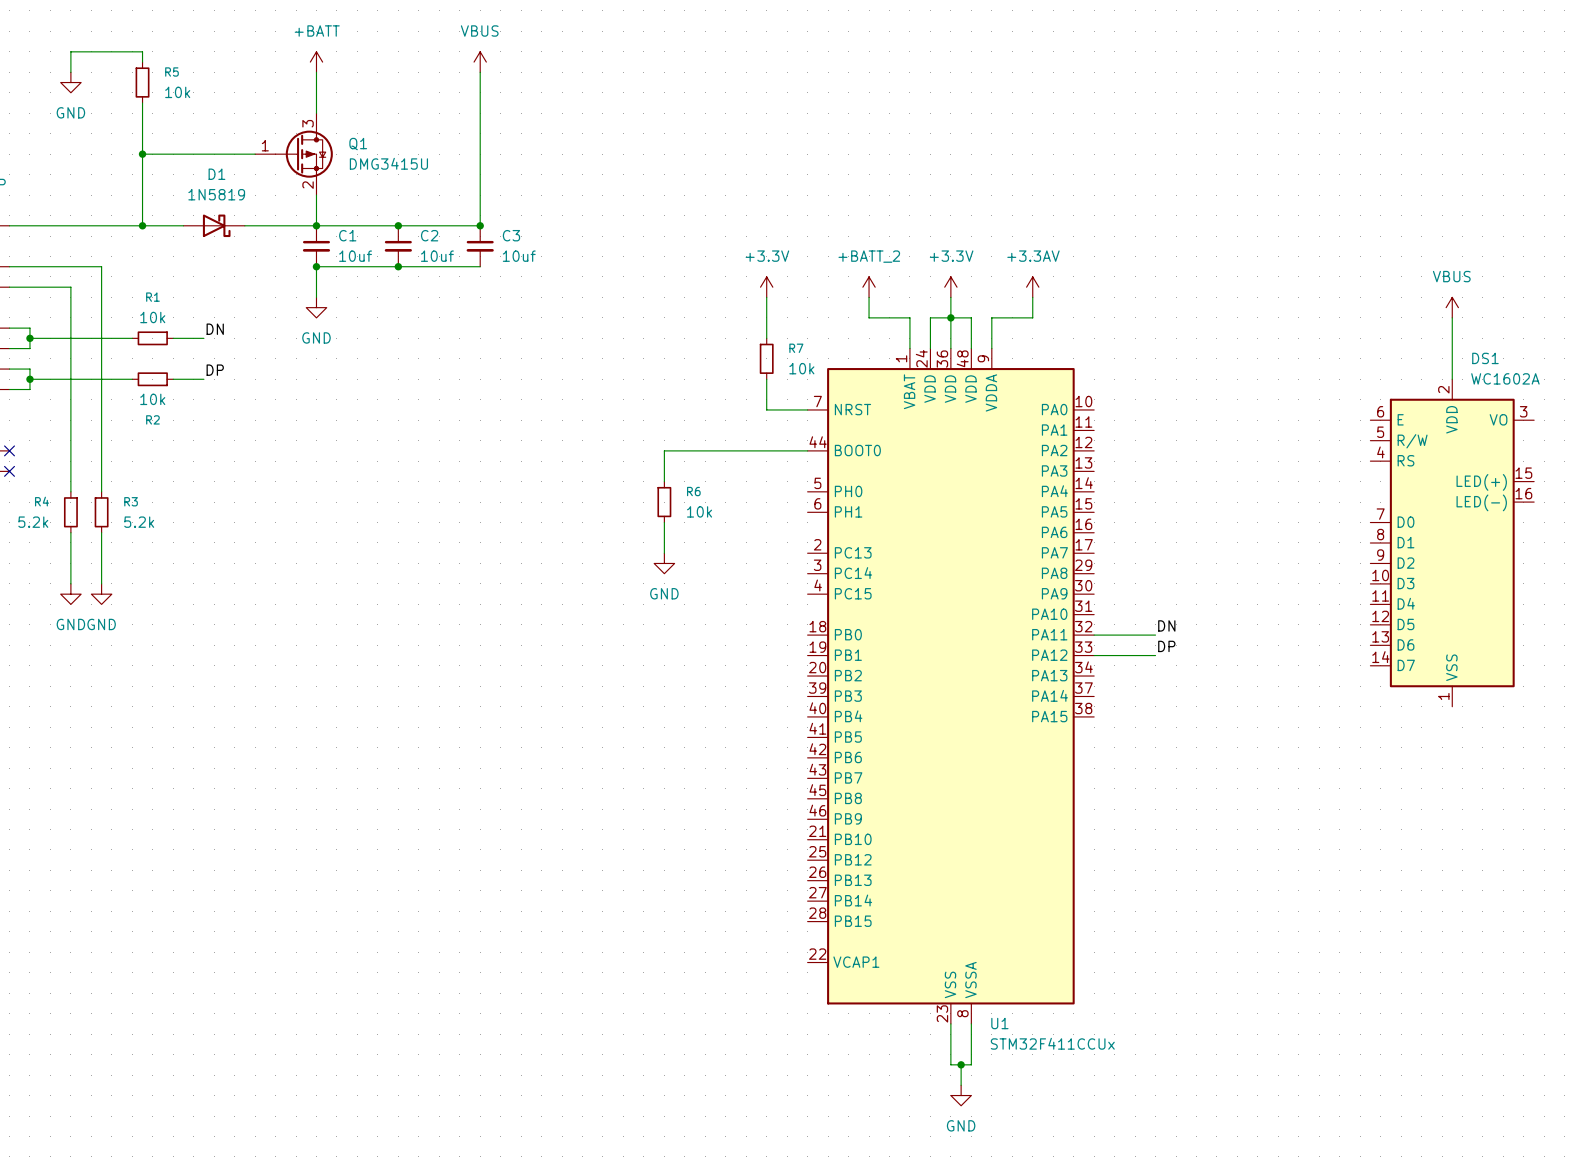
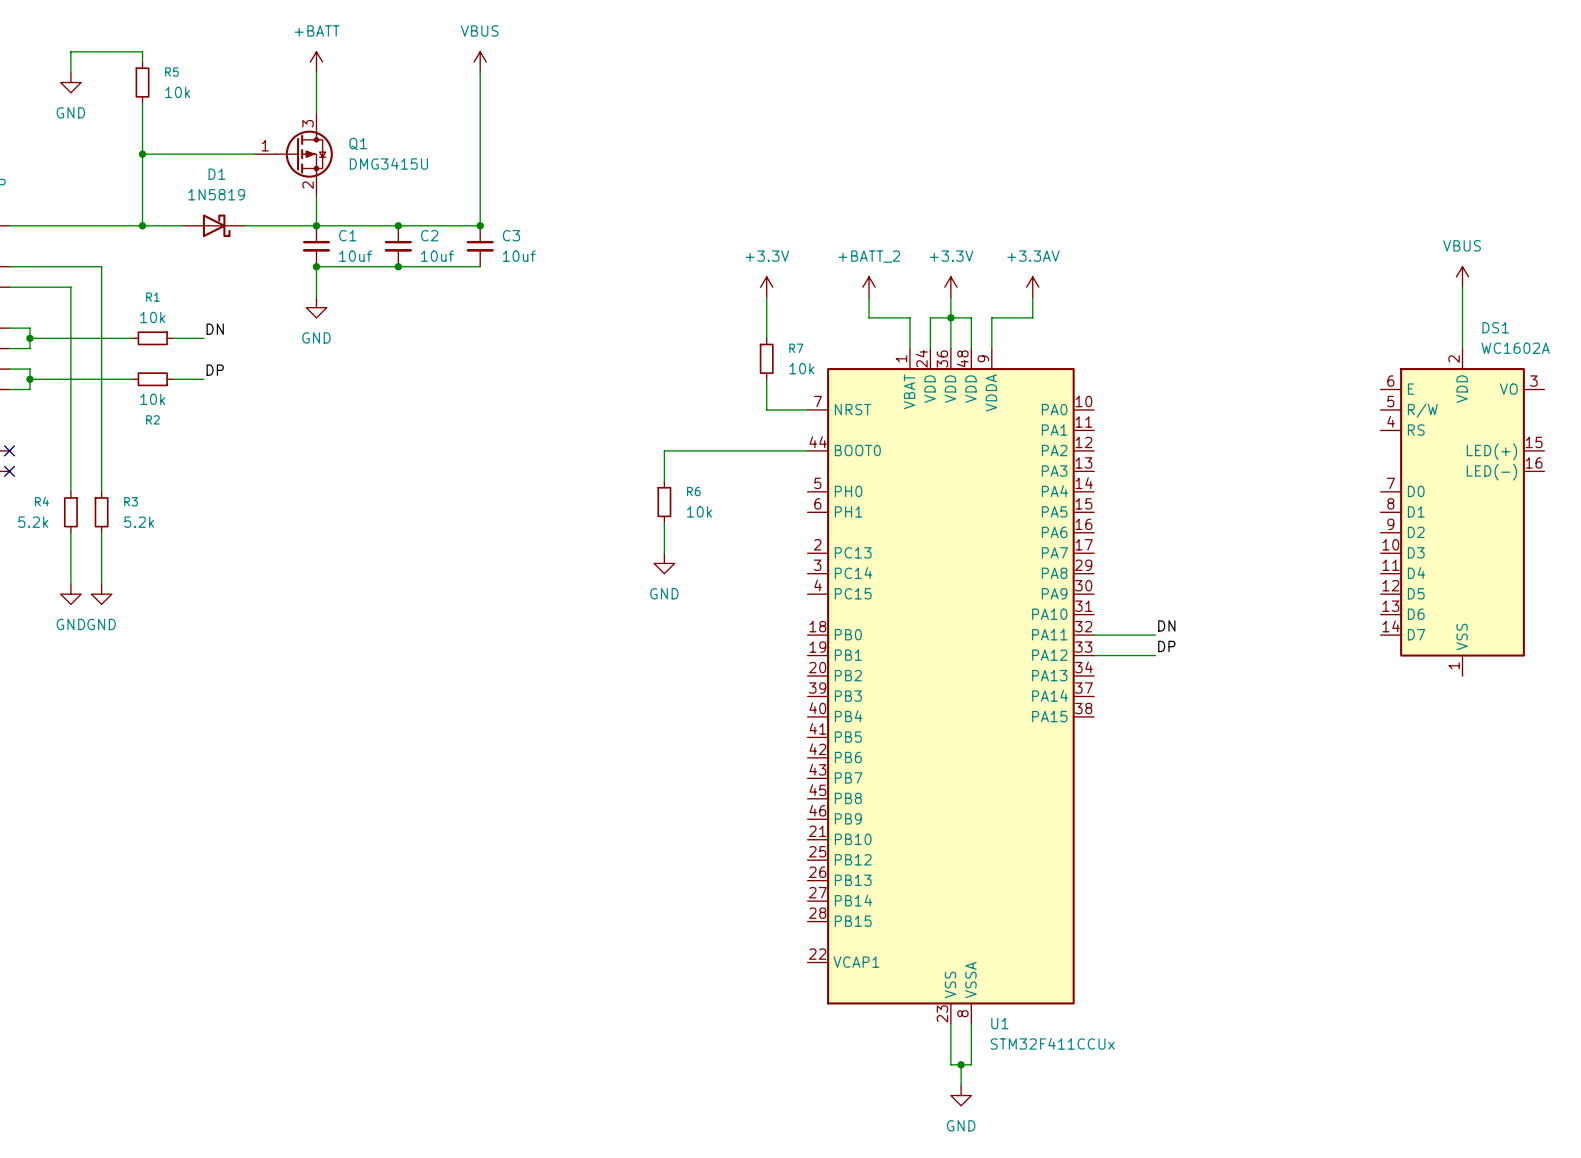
power symbol position: VBUS (1452, 307) -> VBUS (1462, 276)
wire: (1452, 317) (1452, 379) -> (1462, 287) (1462, 348)
DS1 position: (1452, 542) -> (1462, 512)

